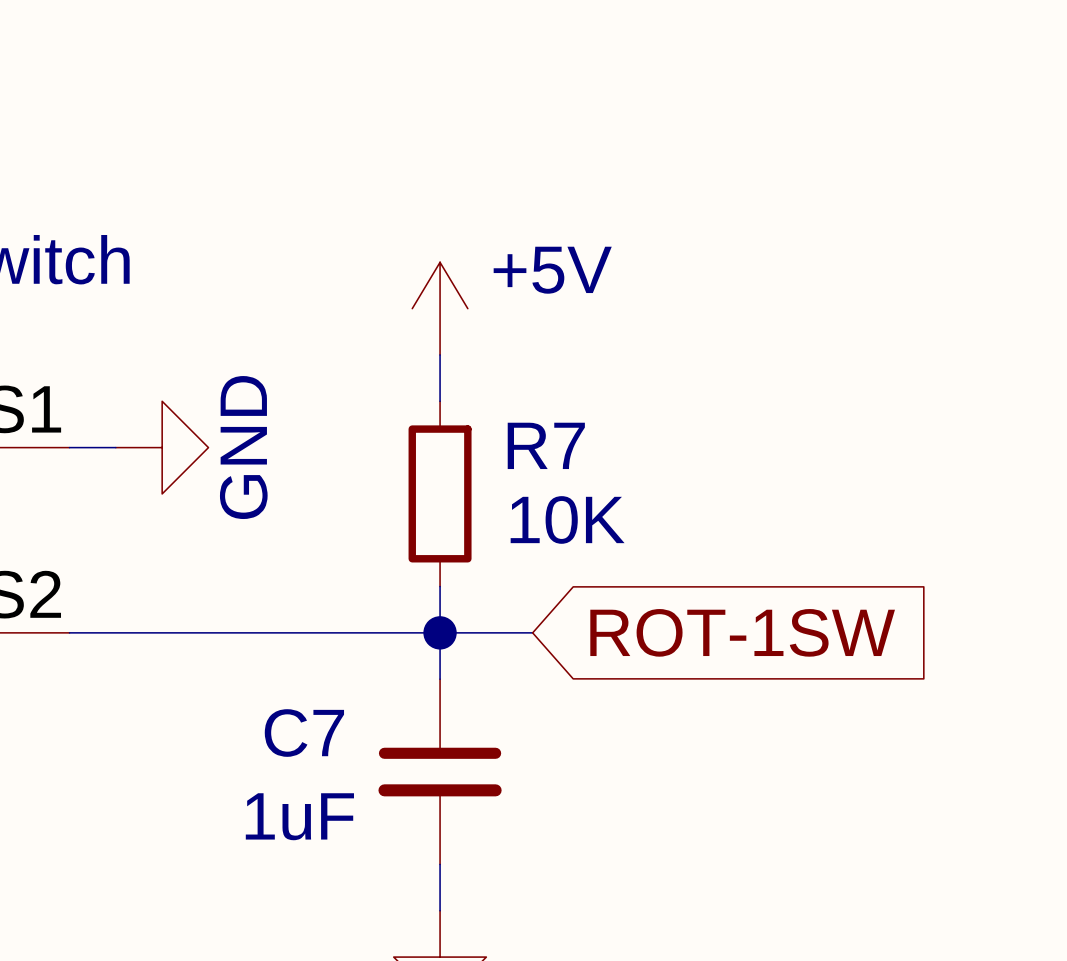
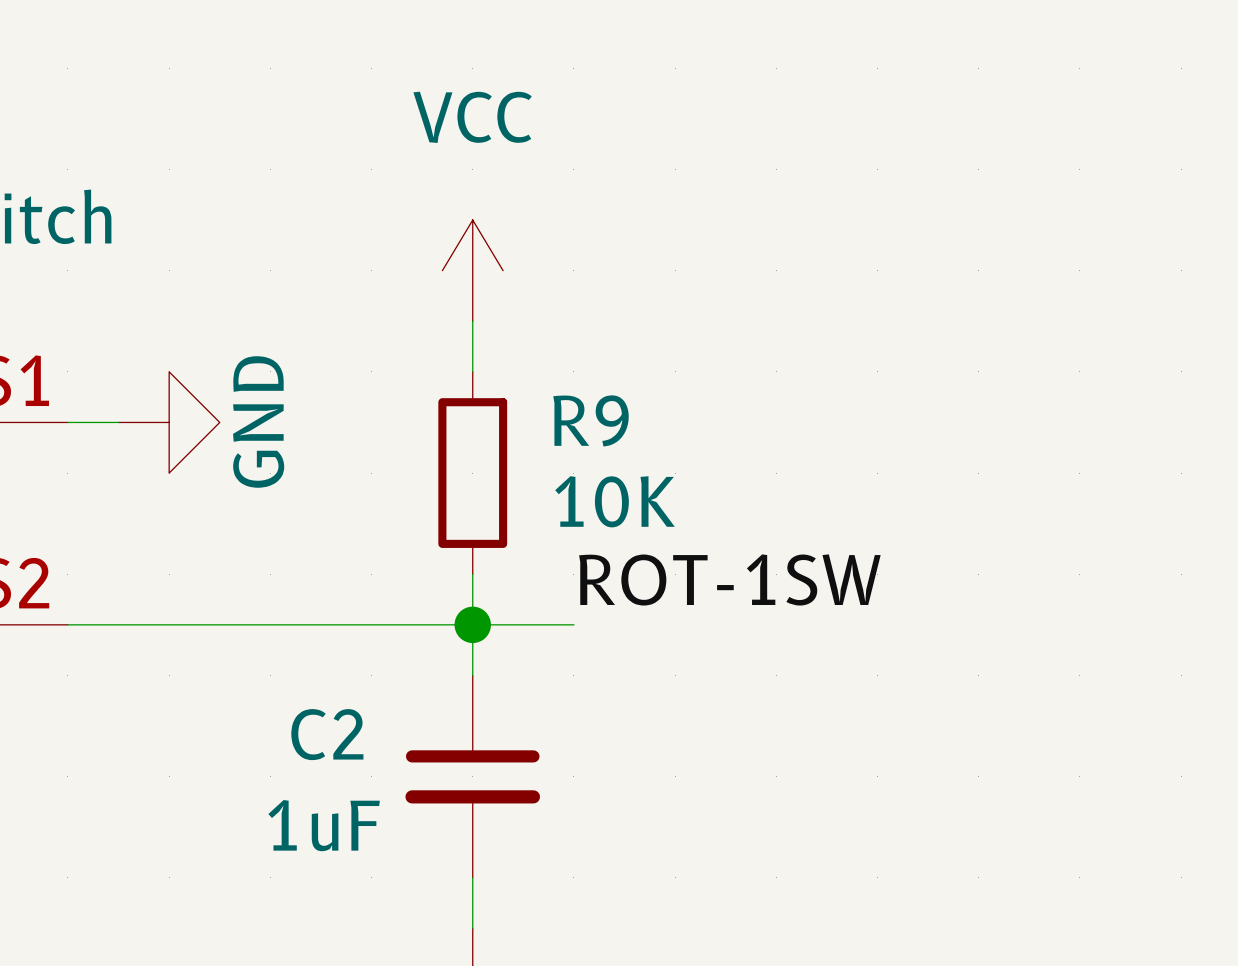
power symbol: +5V (440, 308) -> VCC (472, 270)
R7 name: R7 (546, 445) -> R9 (590, 420)
label: none -> ROT-1SW (729, 579)
global label: ROT-1SW (742, 632) -> none
C7 name: C7 (304, 733) -> C2 (327, 734)

